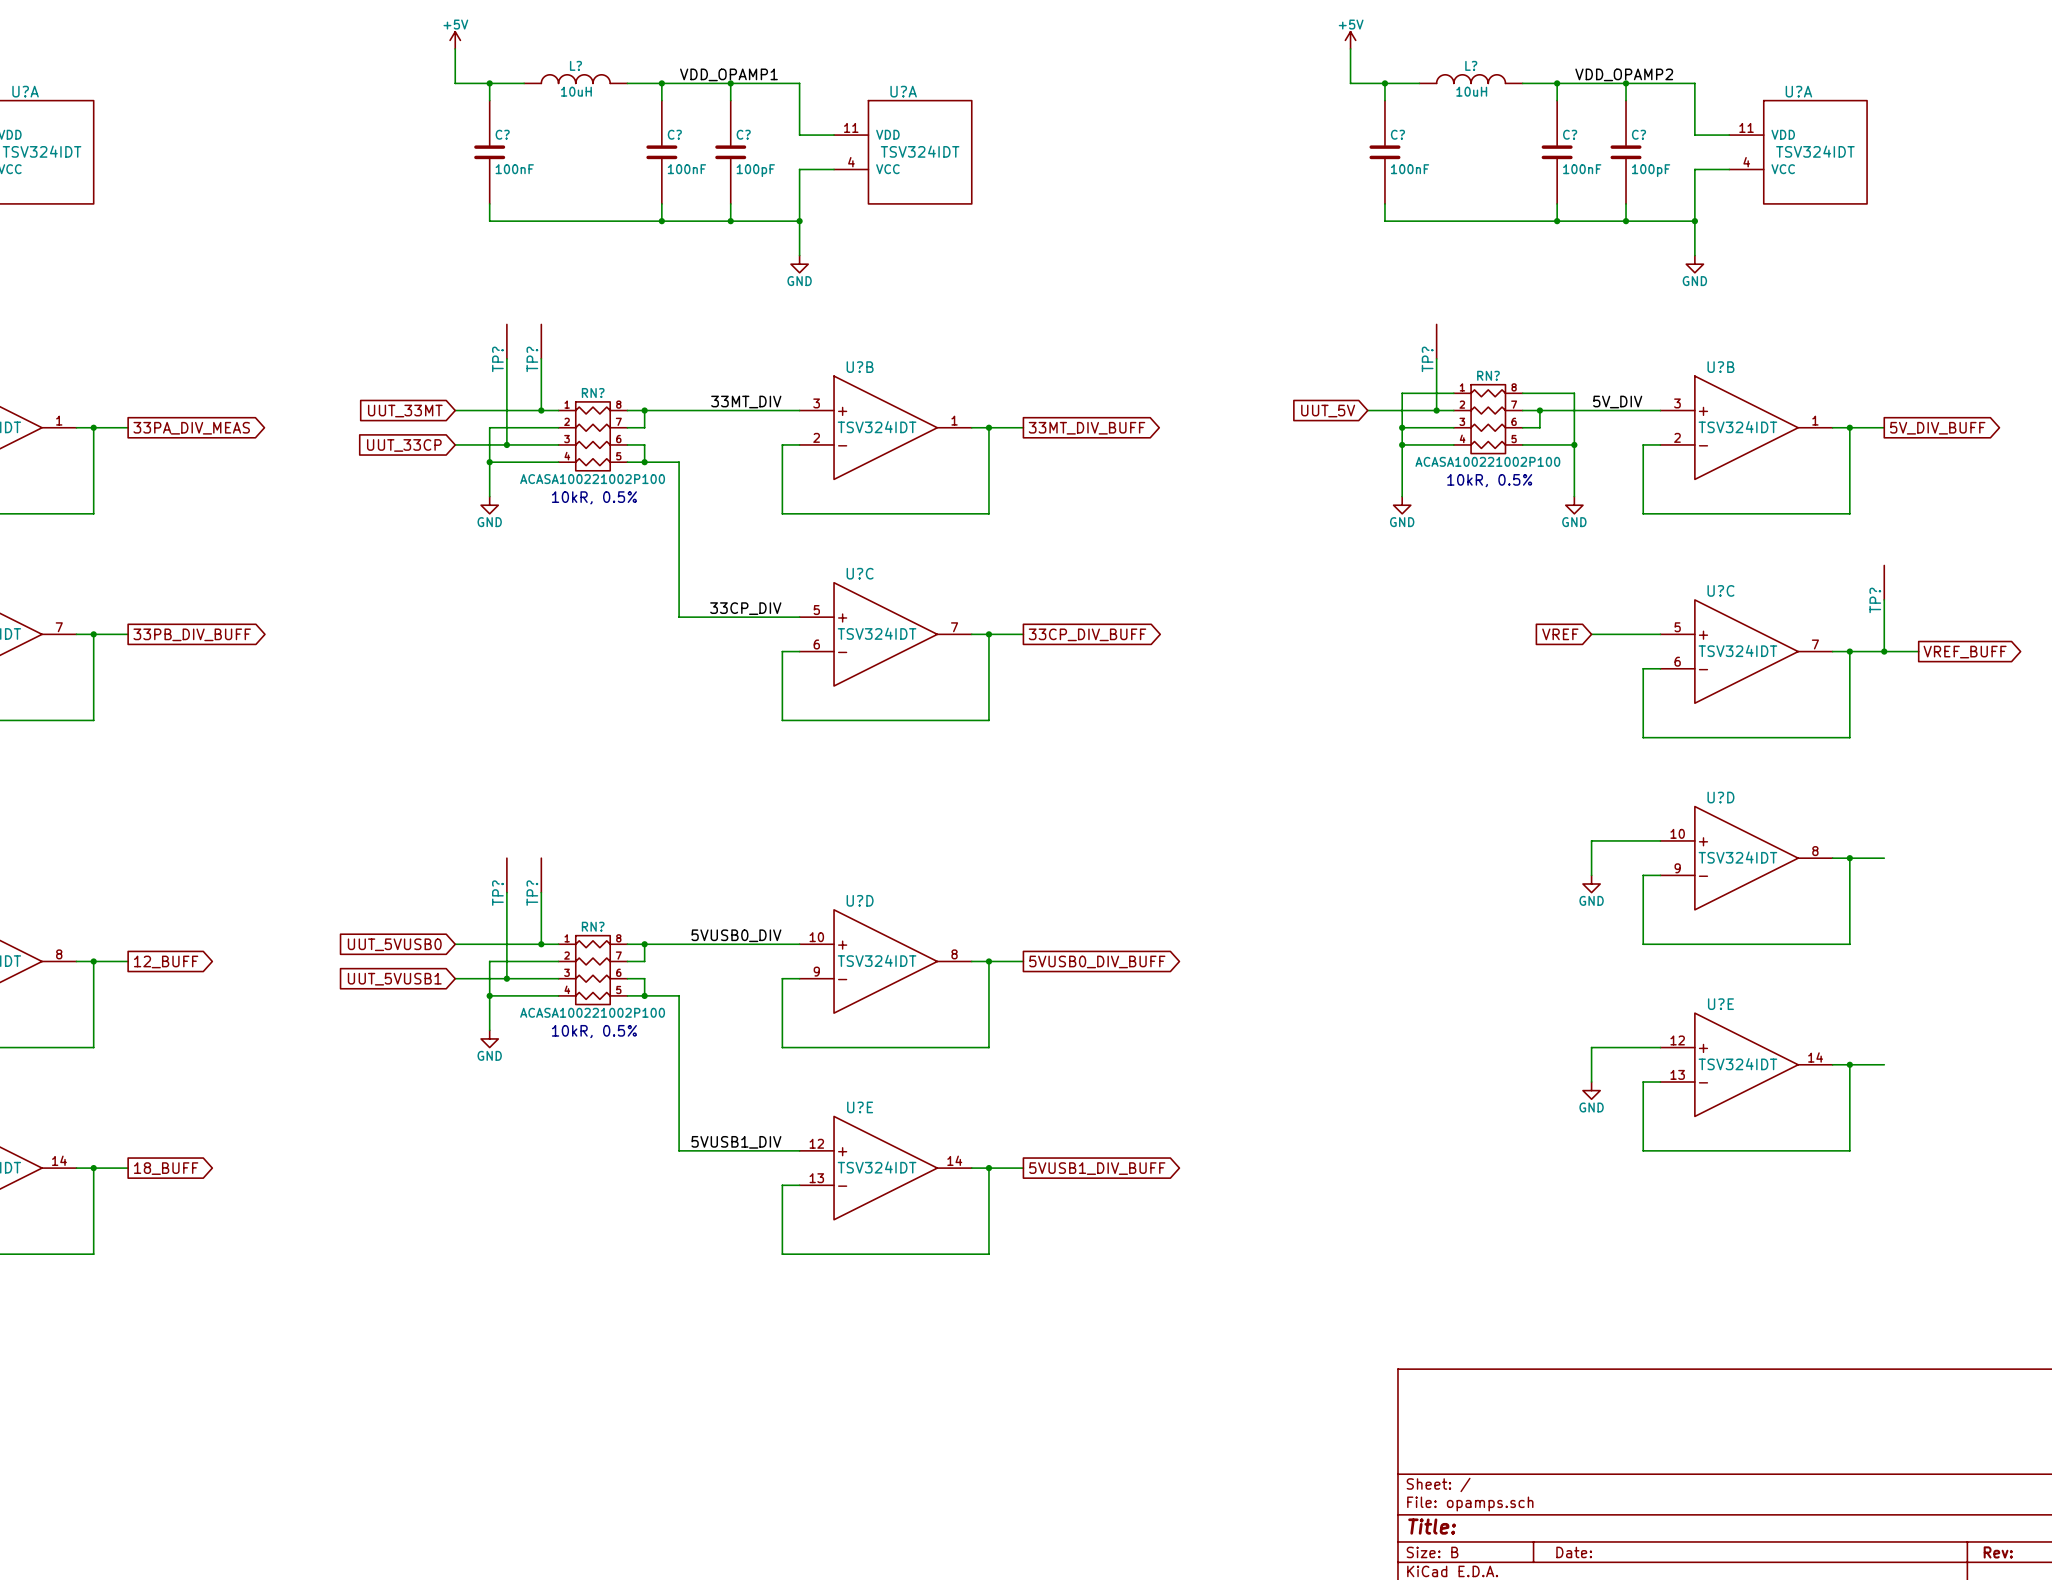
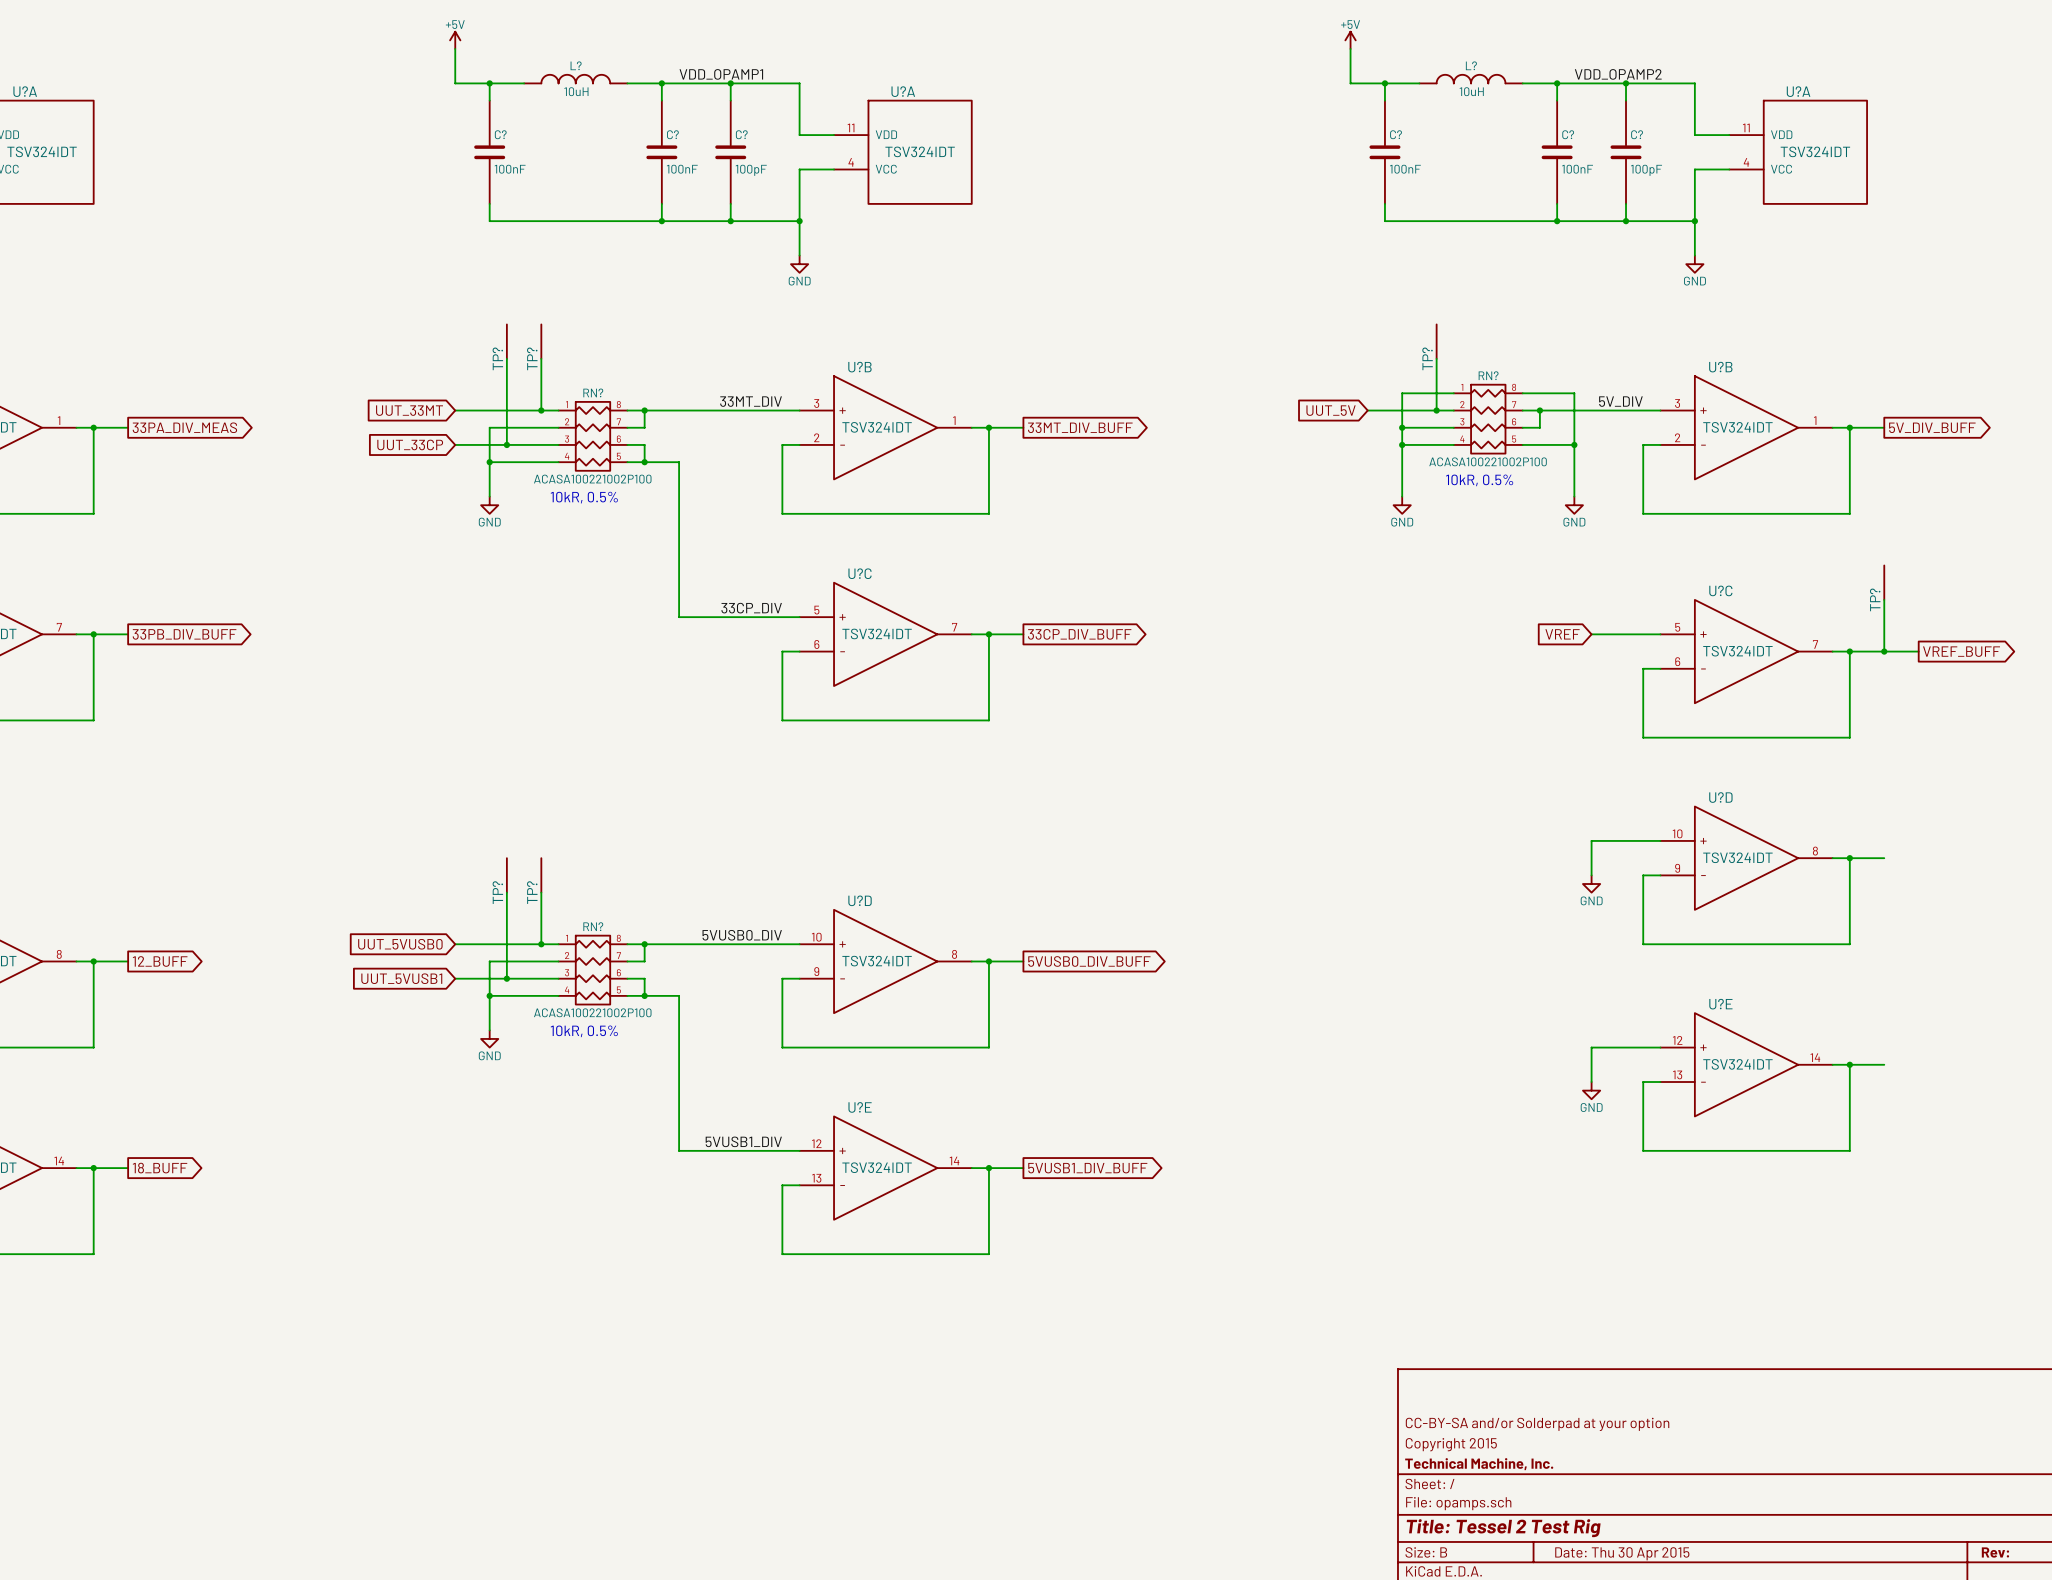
title block: none -> CC-BY-SA and/or Solderpad at your option (1537, 1424)
title block: none -> Copyright 2015 (1451, 1444)
title block: none -> Technical Machine, Inc. (1479, 1464)
title block: Title: (1432, 1526) -> Title: Tessel 2 Test Rig (1503, 1528)
title block: Date: (1574, 1552) -> Date: Thu 30 Apr 2015 (1622, 1553)

